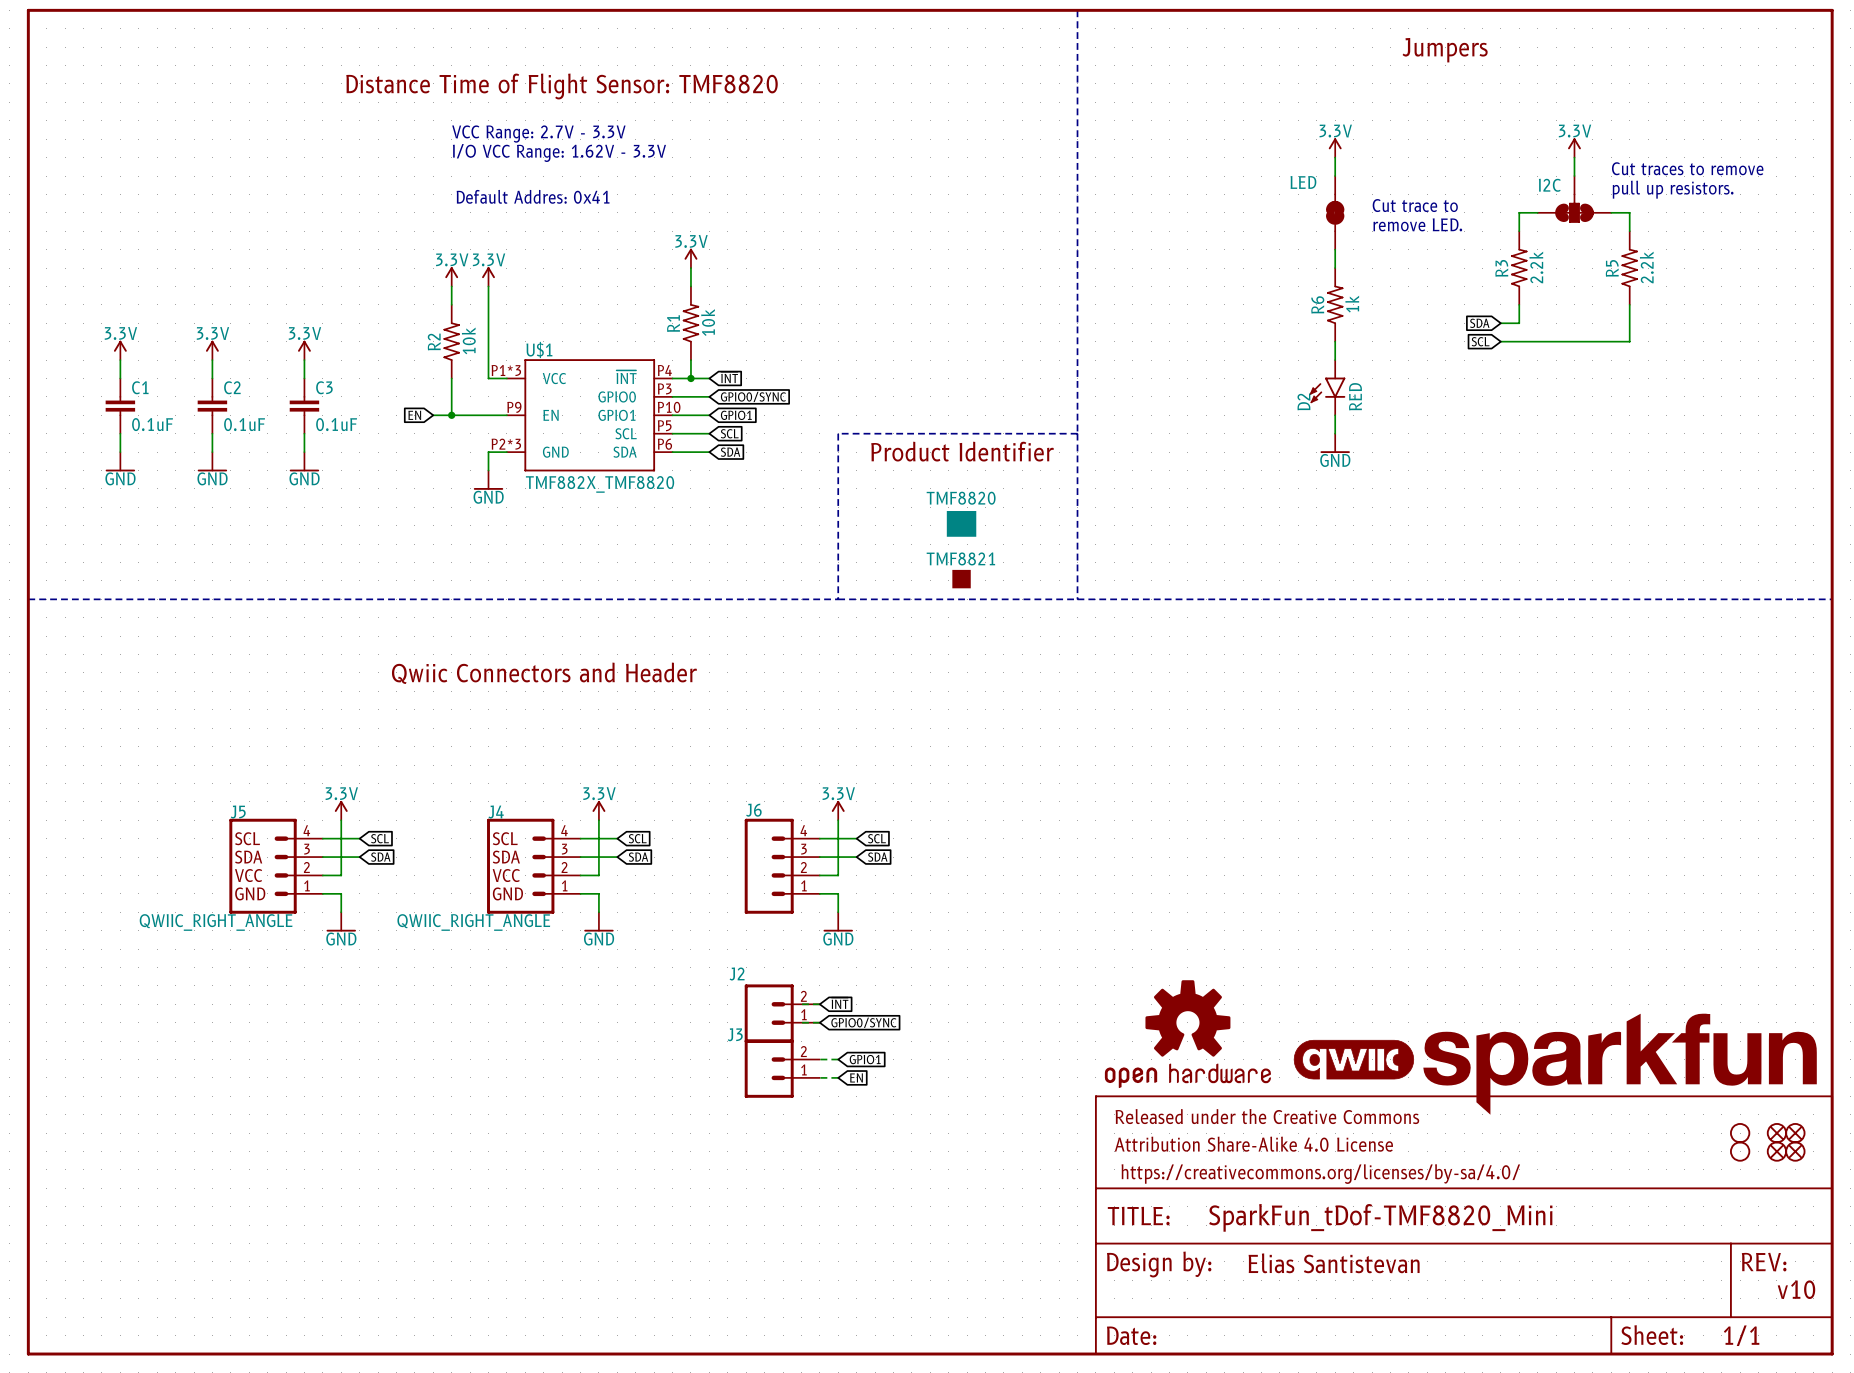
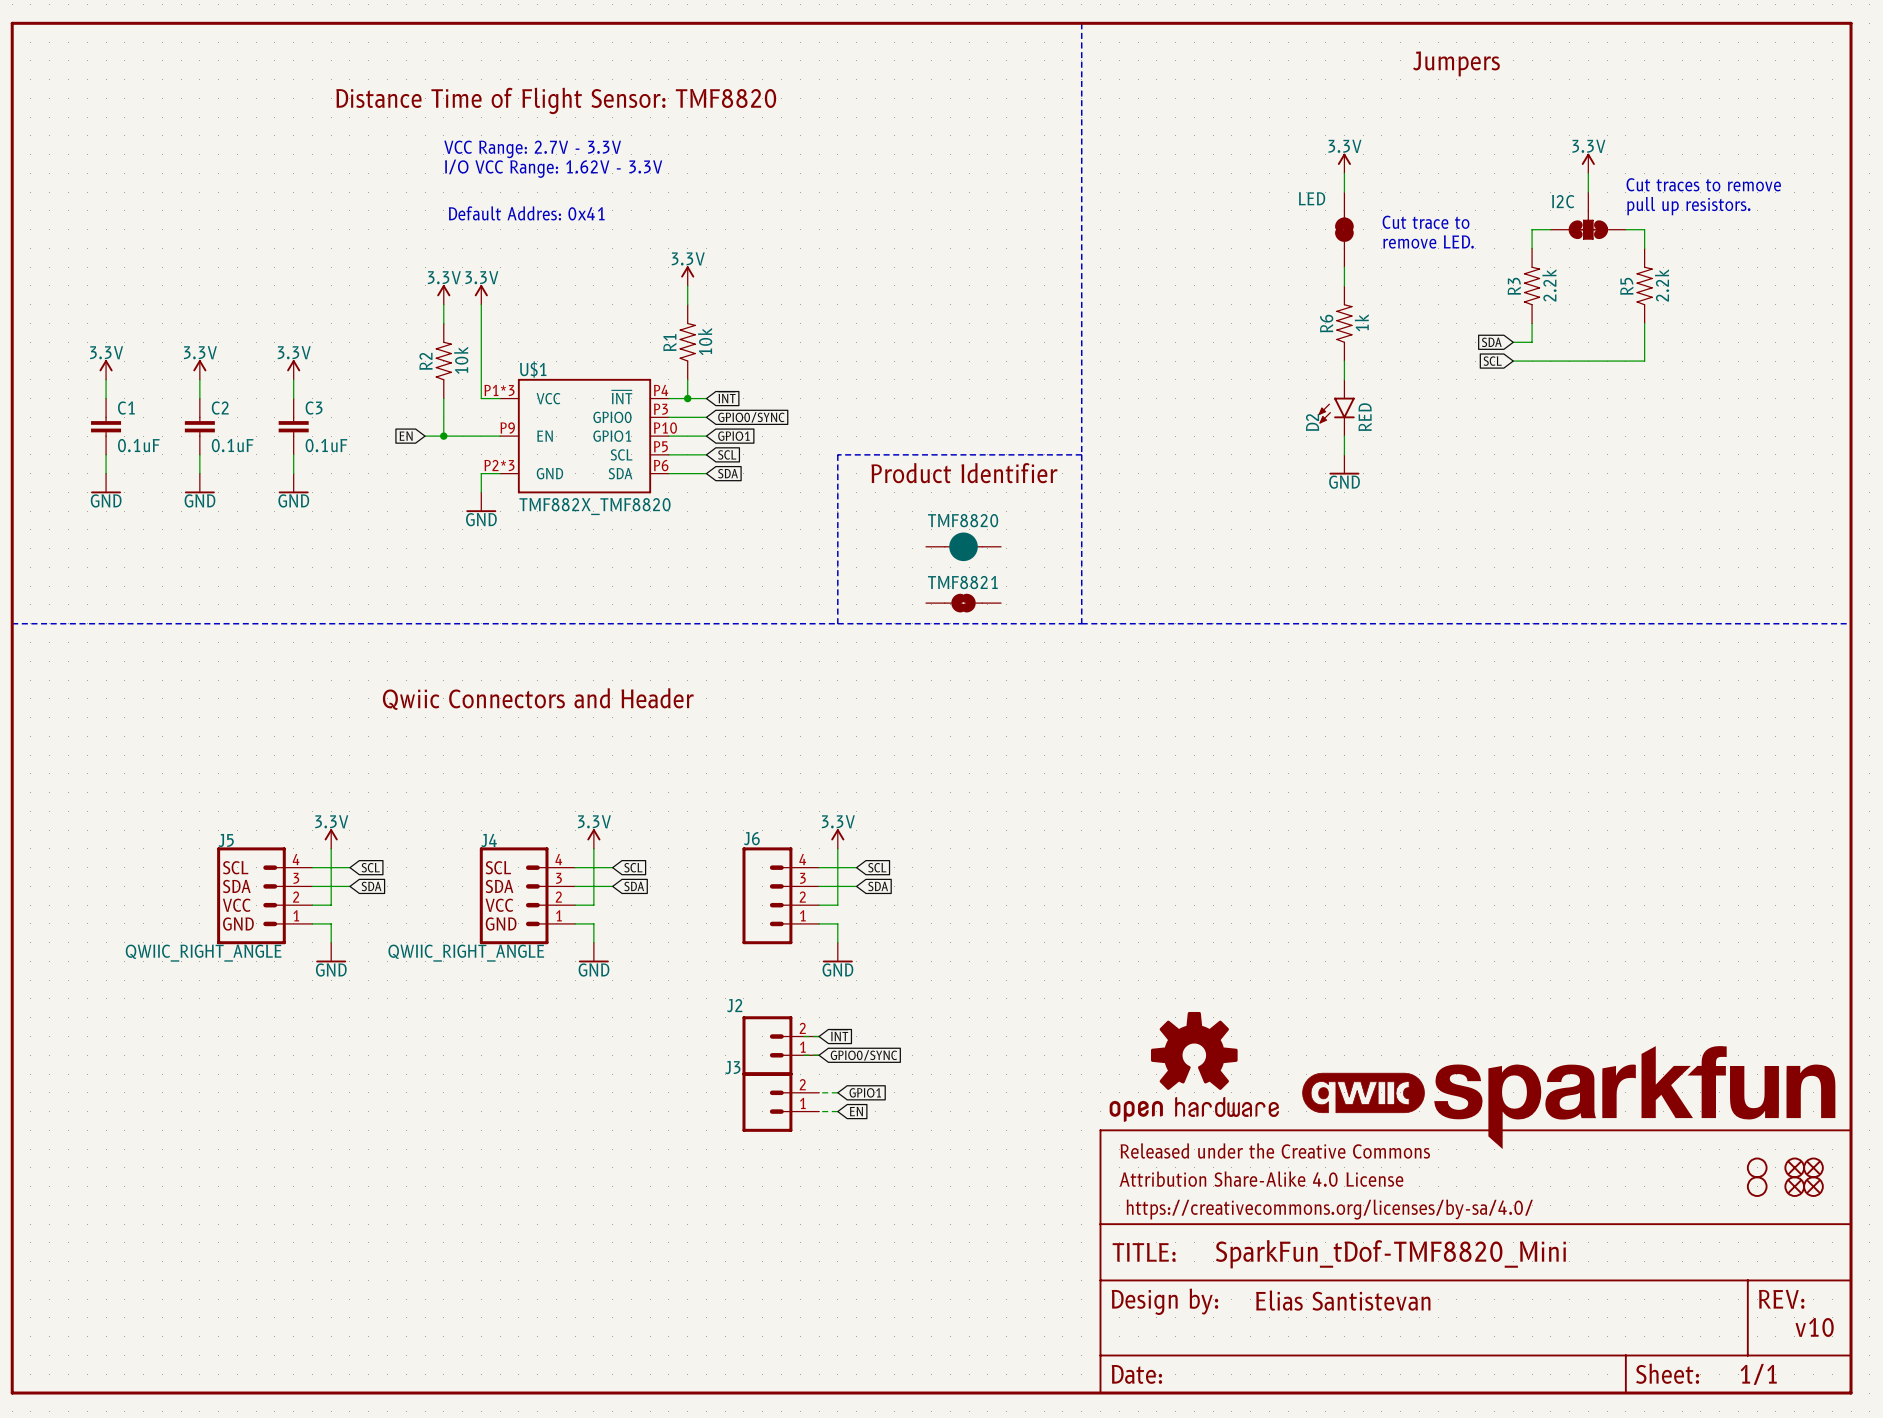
TMF8820 symbol: [946, 511, 977, 537] -> [925, 532, 1002, 562]
TMF8821 symbol: [952, 569, 971, 589] -> [925, 593, 1002, 613]

